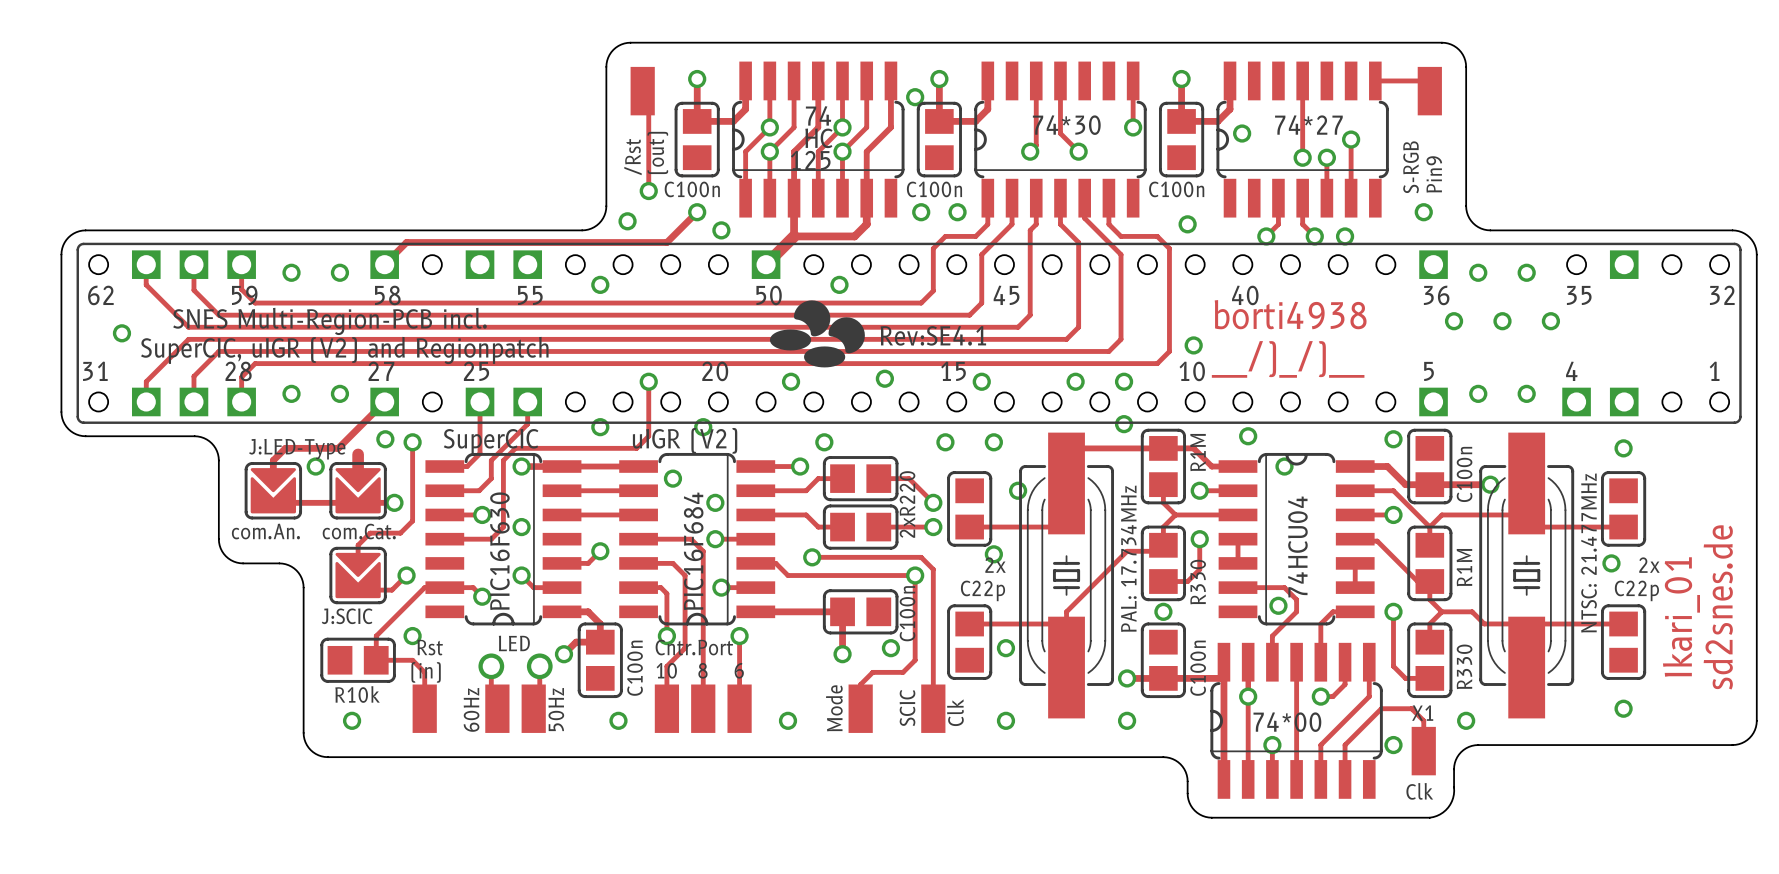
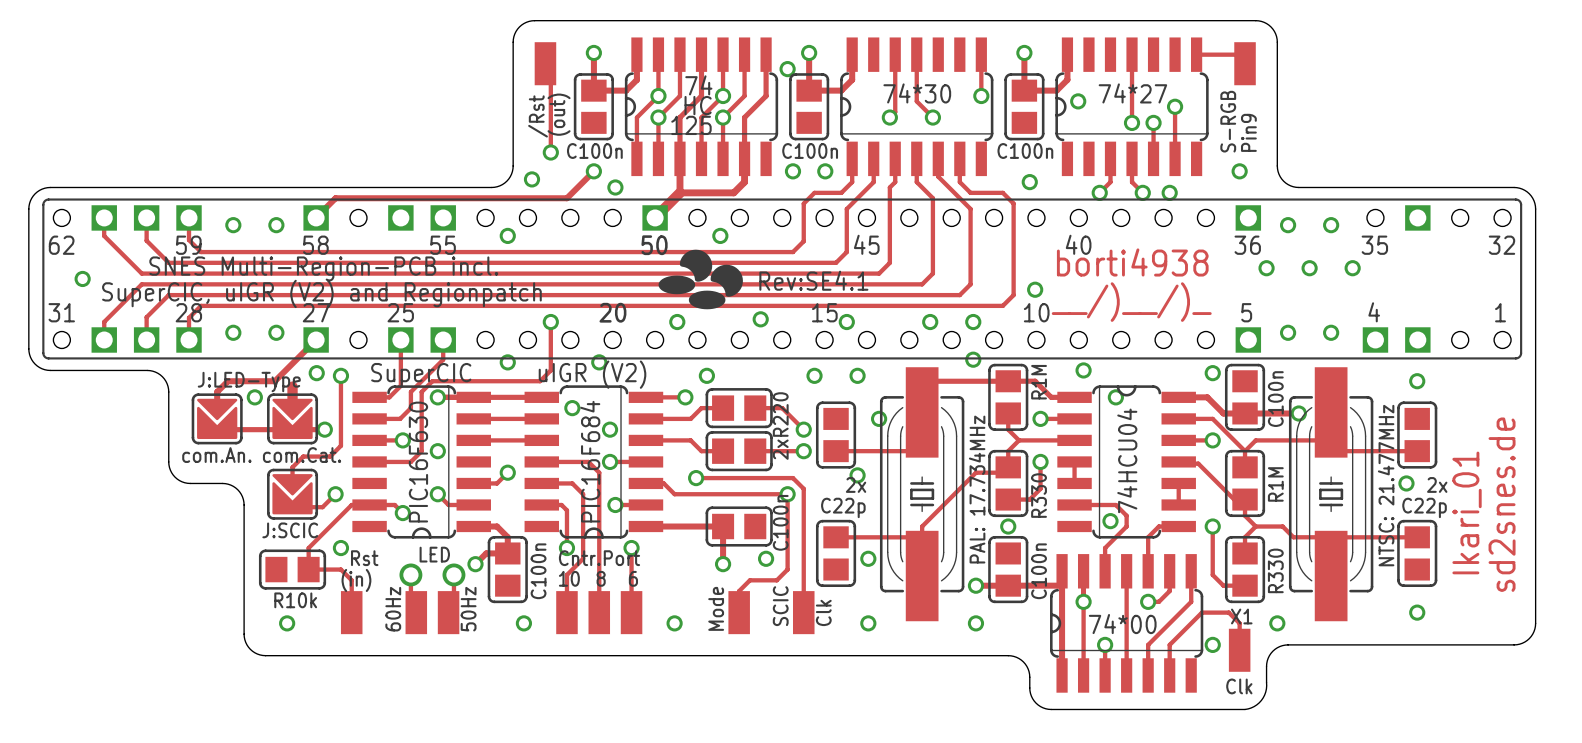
text: __/)_/)__ (1288, 359) -> __/)__/)_ (1131, 302)

